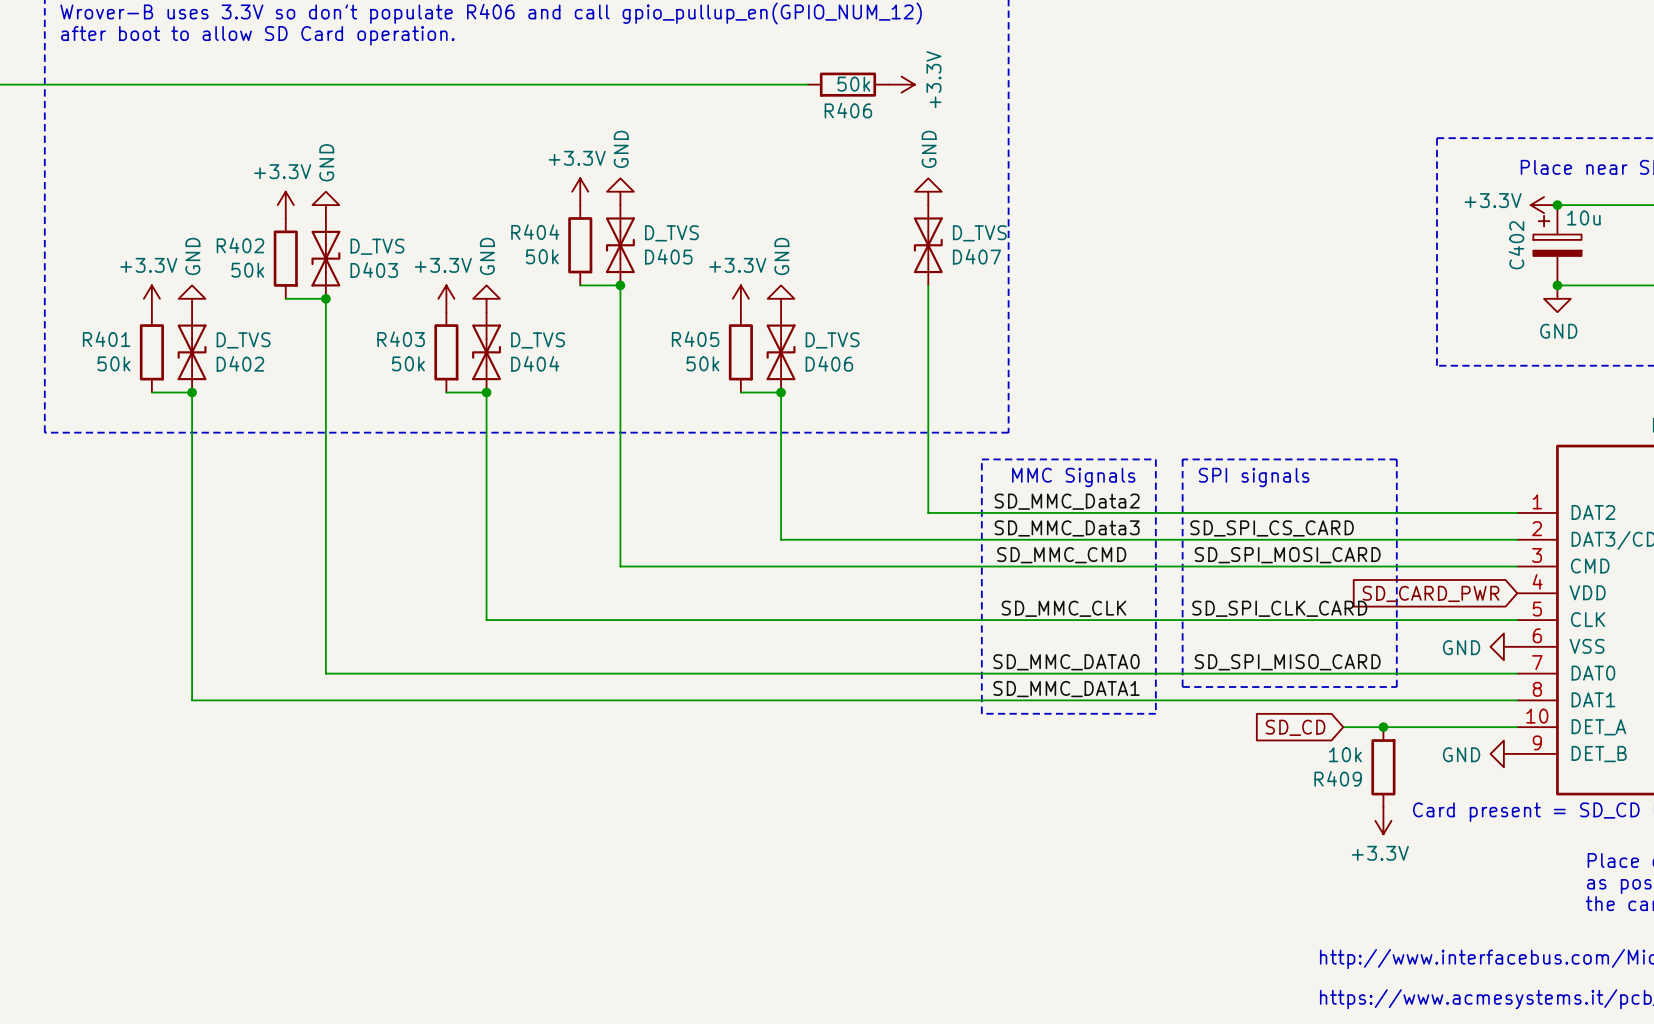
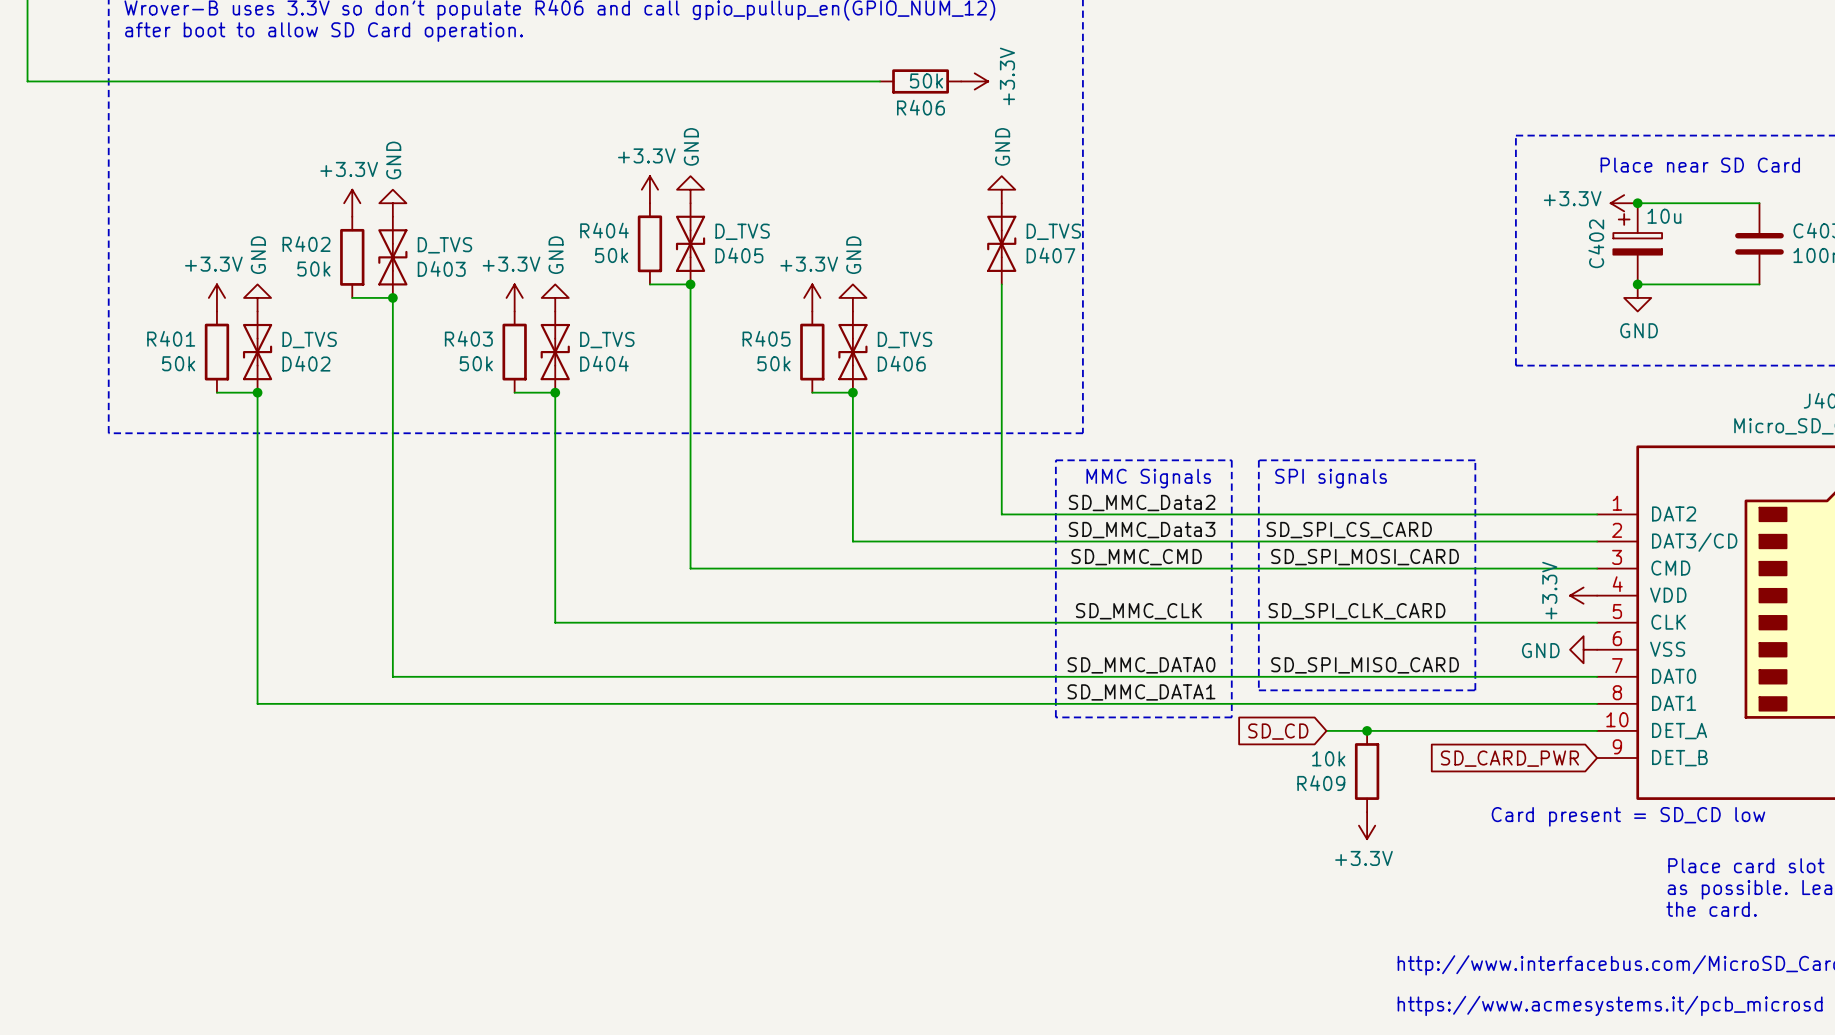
global label position: SD_CARD_PWR (1431, 593) -> SD_CARD_PWR (1509, 758)
power symbol: none -> +3.3V (1583, 595)
wire: none -> (1326, 730) (1421, 730)
junction: none -> (1367, 730)
global label position: SD_CD (1295, 727) -> SD_CD (1278, 731)
junction: (1383, 727) -> none
power symbol: GND (1503, 753) -> none
R409 position: (1383, 767) -> (1367, 771)
power symbol position: +3.3V (1383, 820) -> +3.3V (1367, 825)

